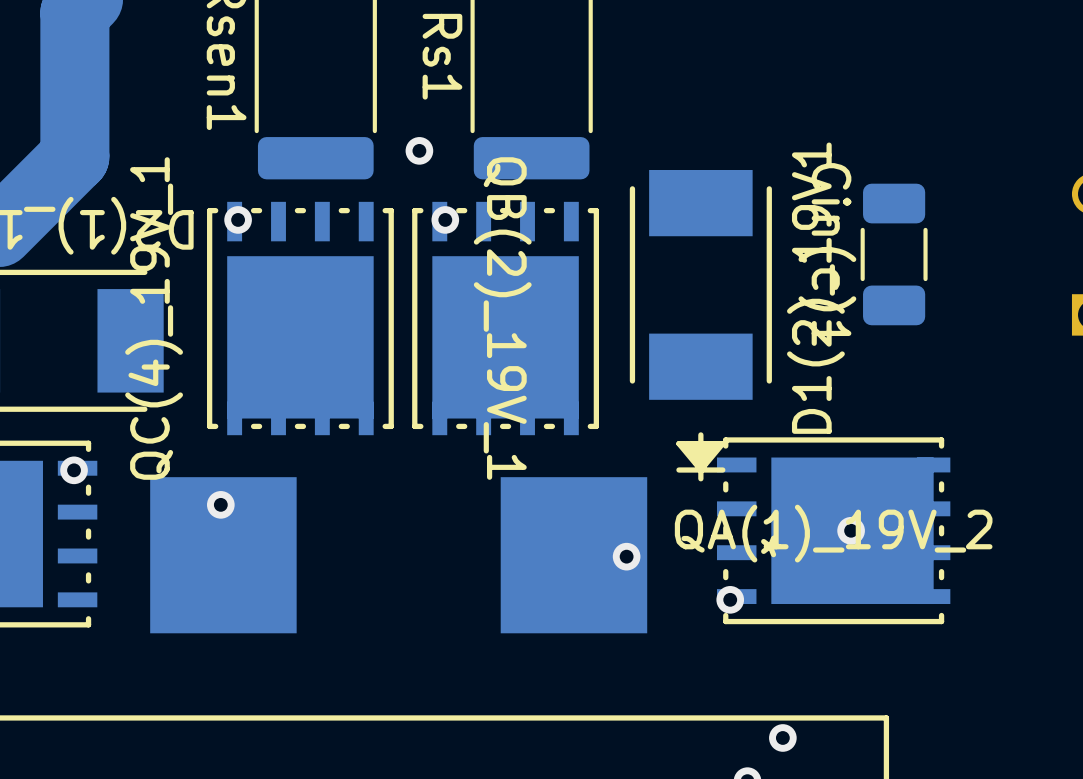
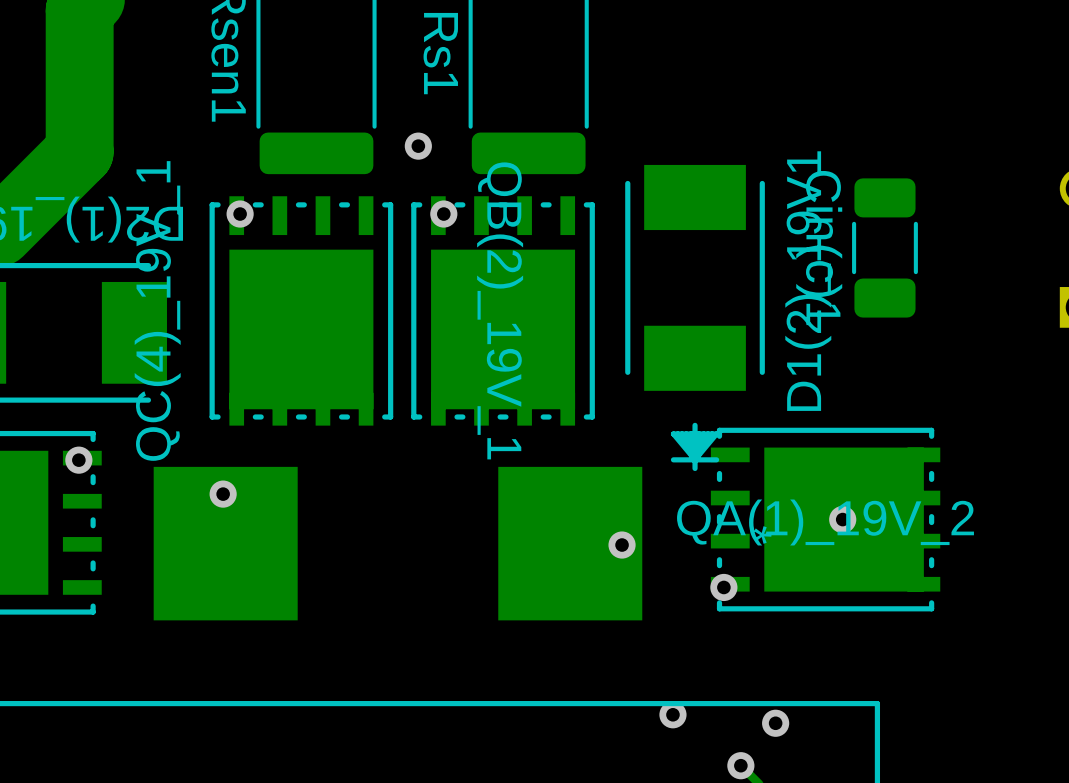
via: none -> (672, 714)

